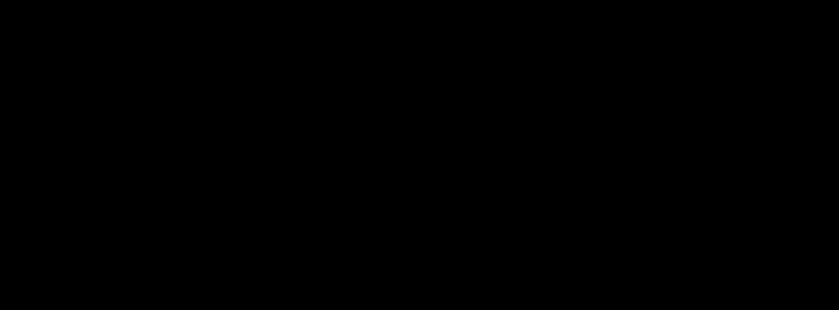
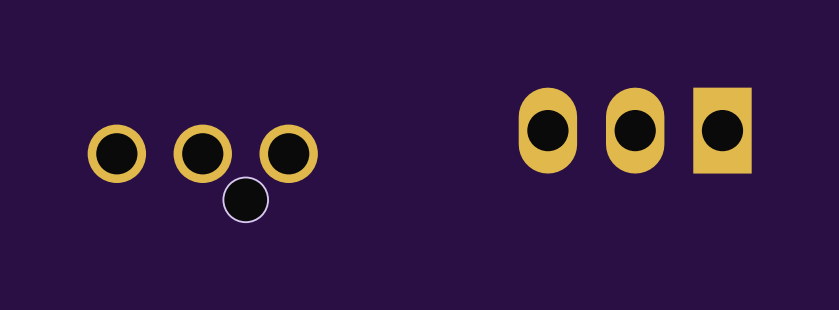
part: none -> (635, 130)
part: none -> (202, 173)

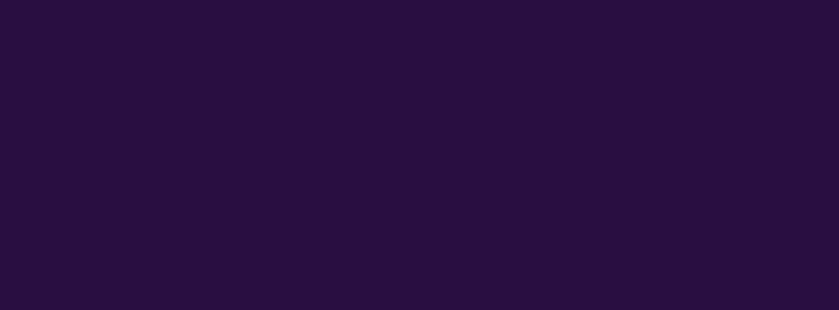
part: (635, 130) -> none
part: (202, 173) -> none

